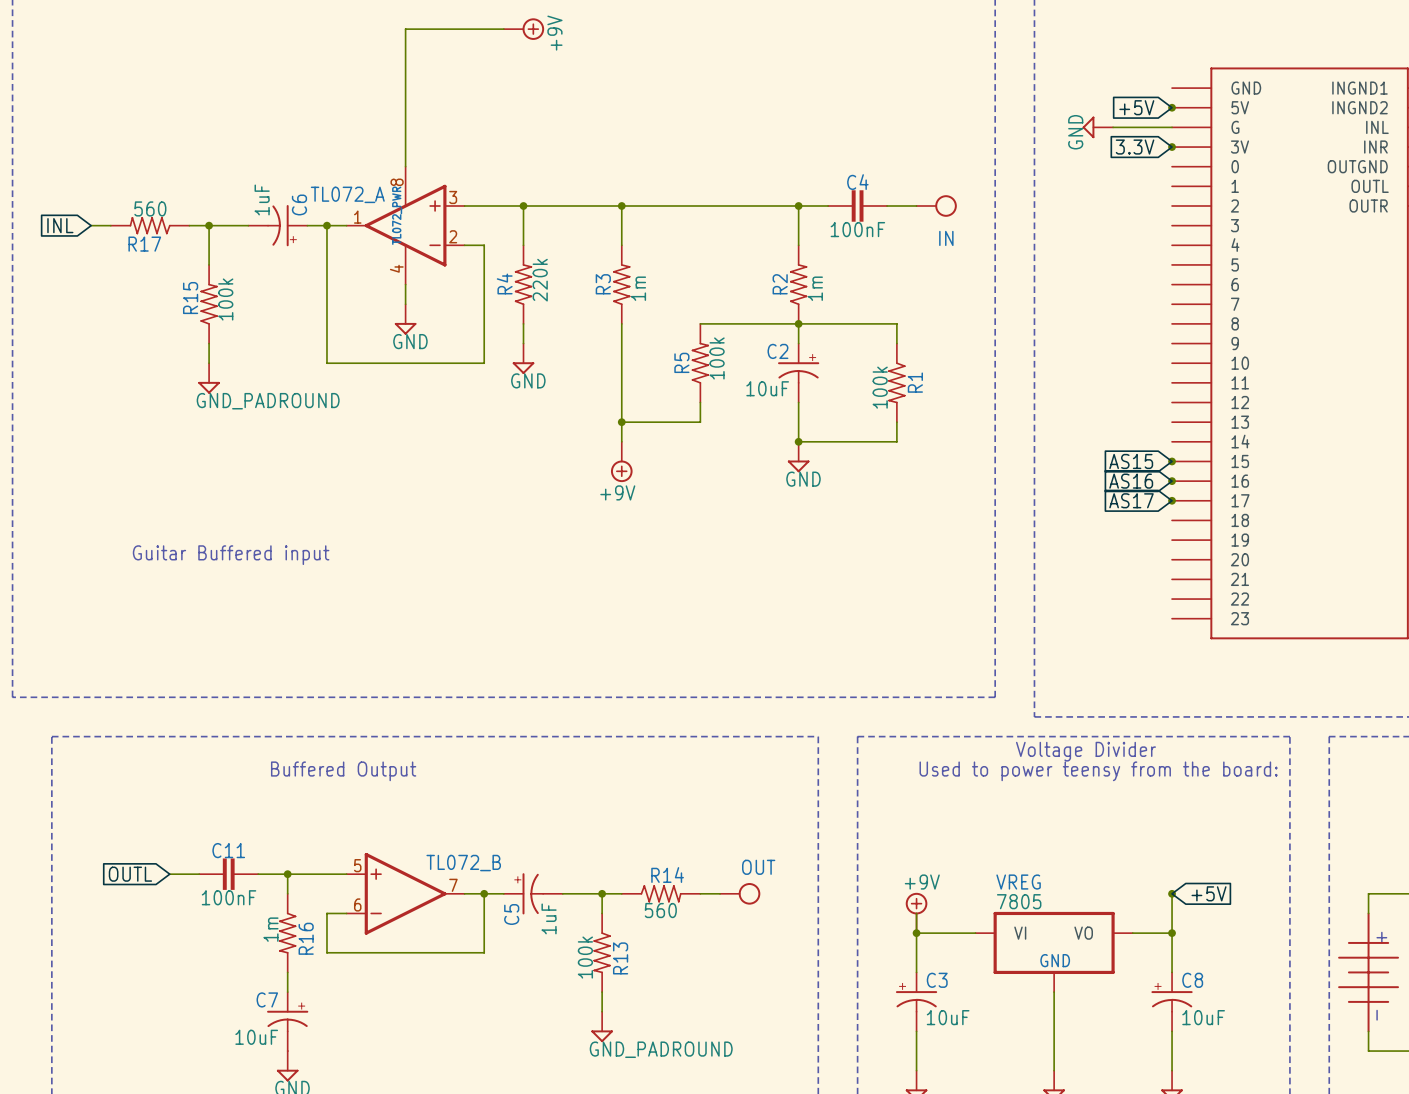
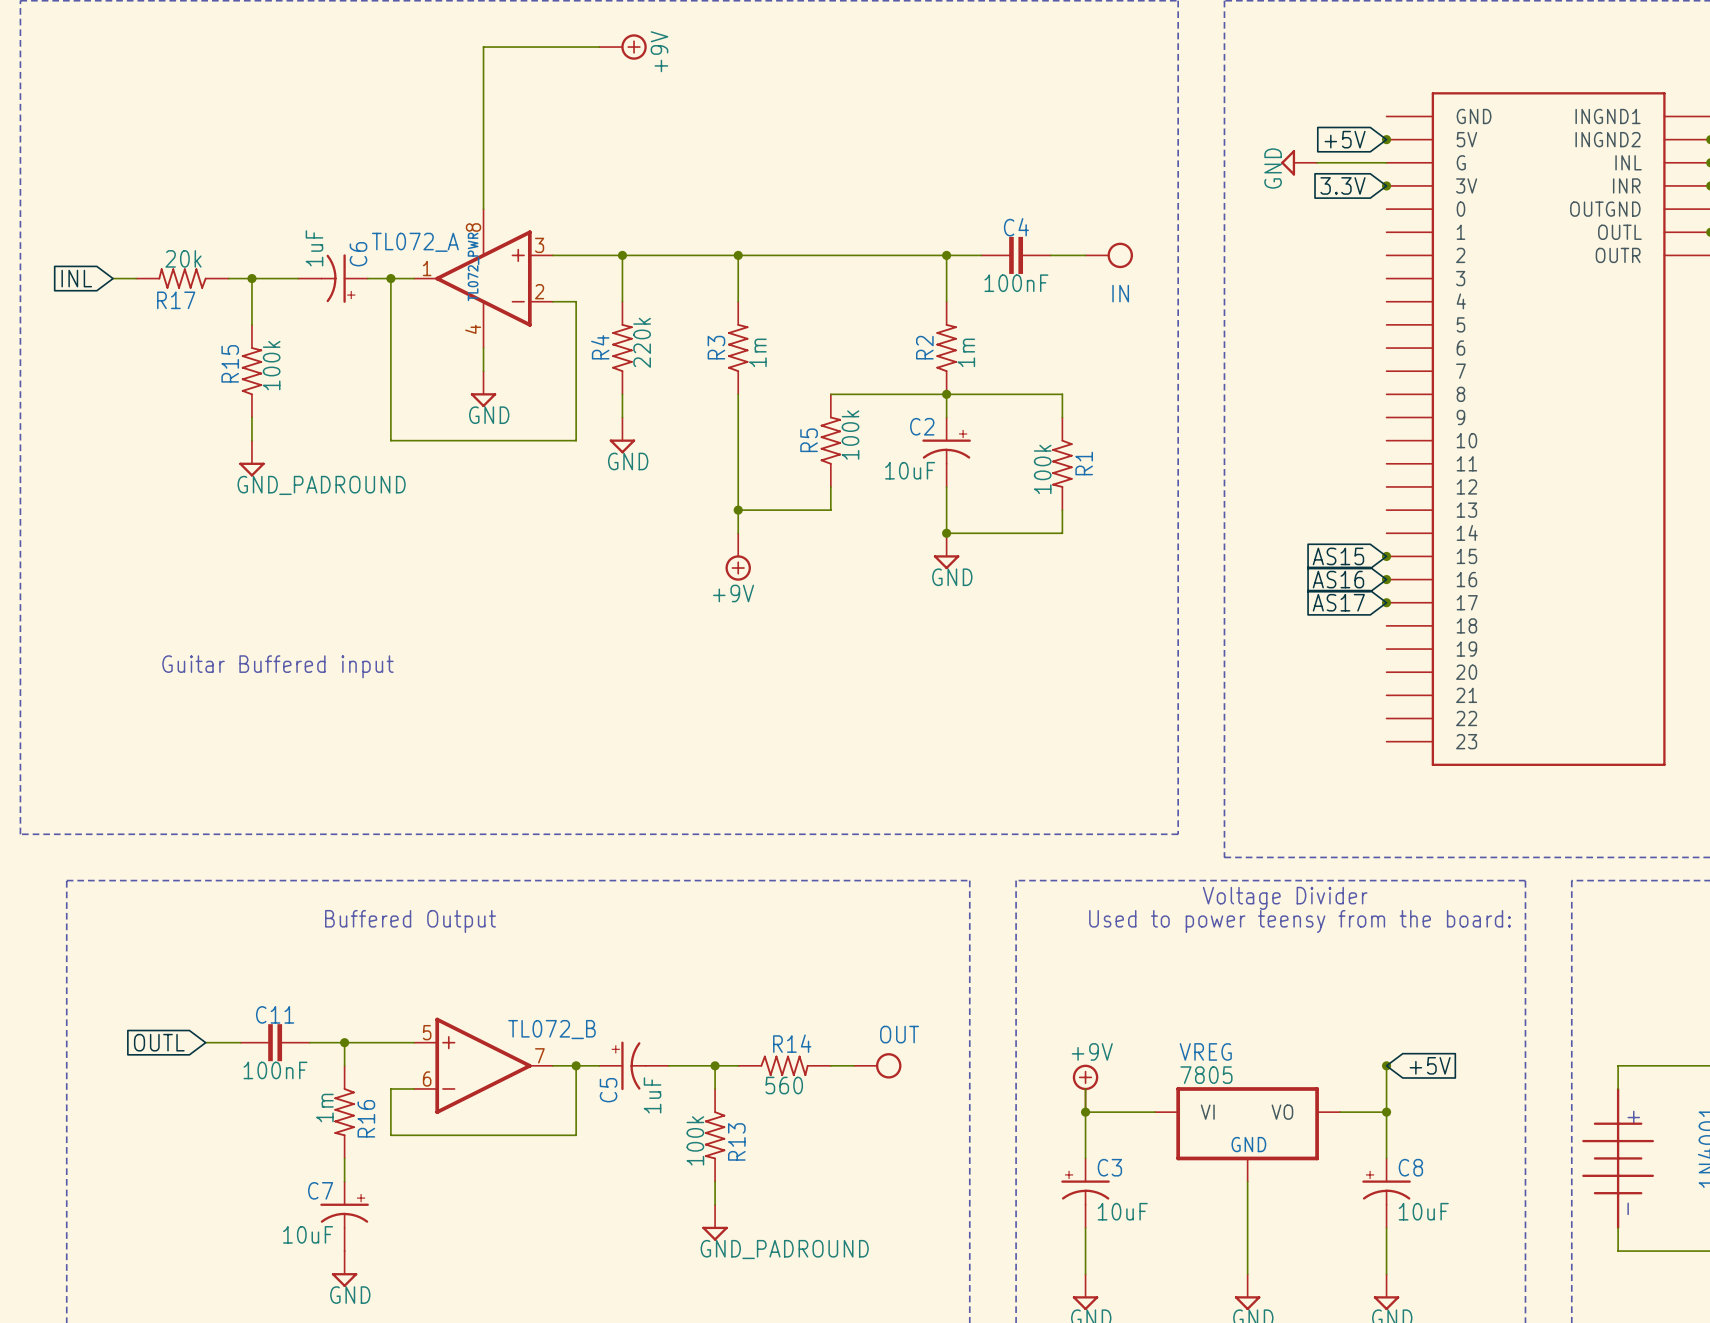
R17 value: 560 (150, 208) -> 20k (183, 258)

